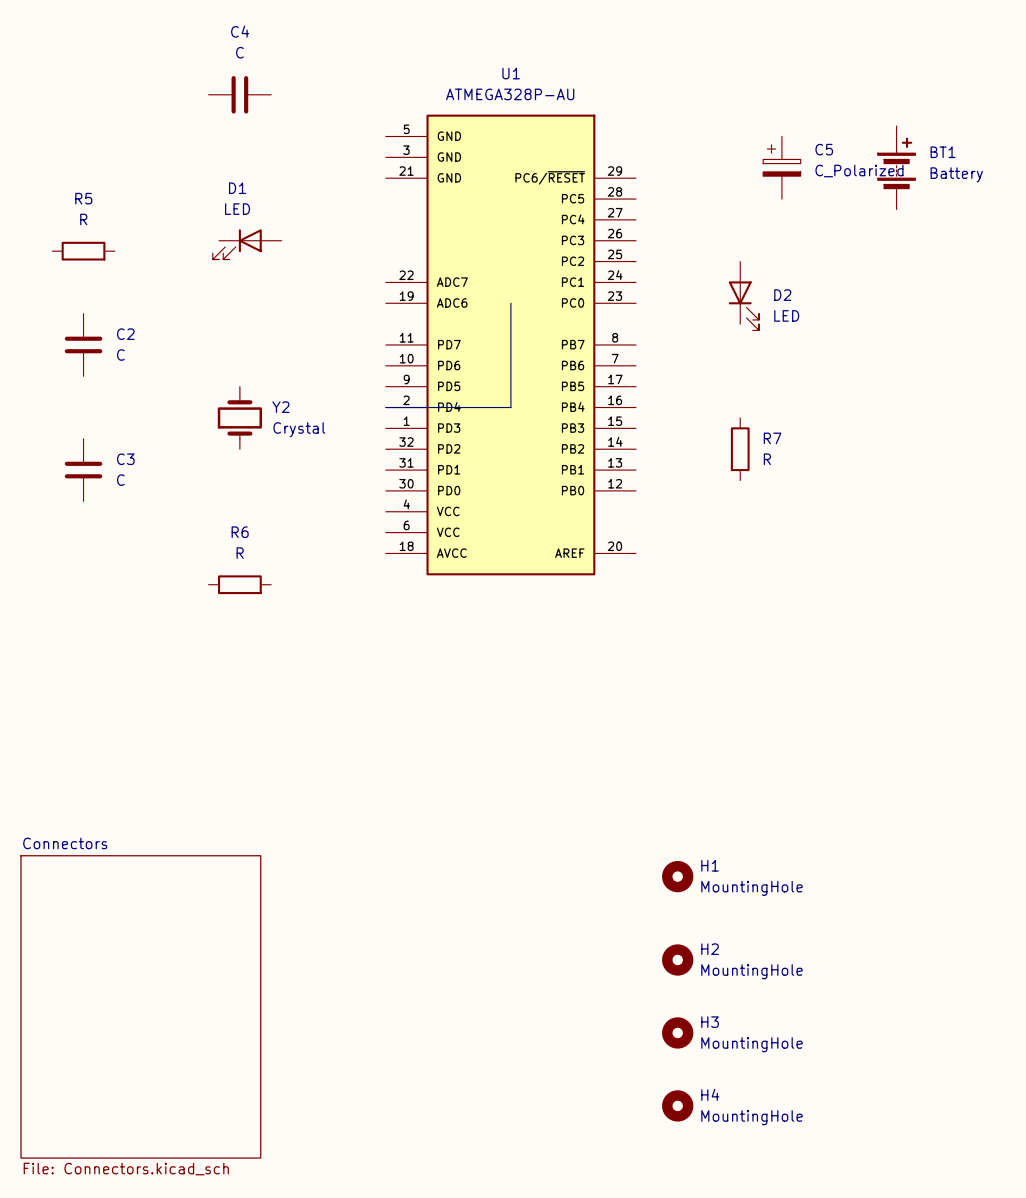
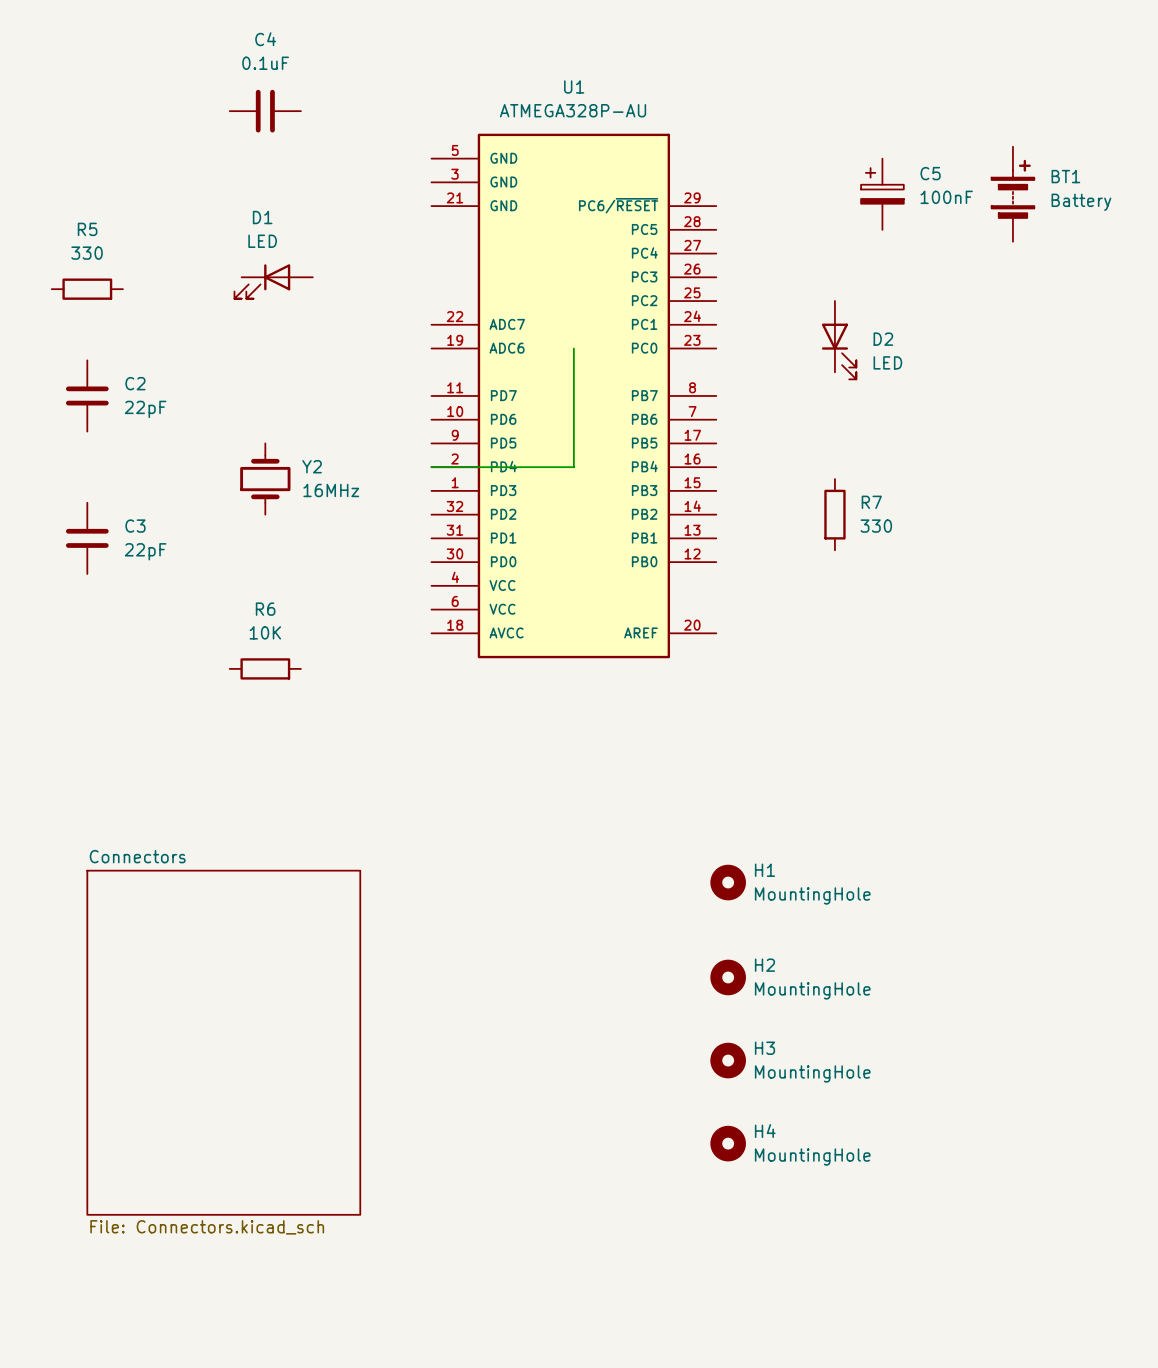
C4 value: C (239, 52) -> 0.1uF (265, 63)
C5 value: C_Polarized (859, 171) -> 100nF (946, 197)
R5 value: R (83, 219) -> 330 (87, 253)
C2 value: C (120, 355) -> 22pF (145, 409)
Y2 value: Crystal (299, 429) -> 16MHz (331, 490)
R7 value: R (767, 459) -> 330 (876, 526)
C3 value: C (120, 480) -> 22pF (145, 551)
R6 value: R (240, 553) -> 10K (265, 632)
H1 position: (677, 876) -> (728, 882)
H2 position: (677, 959) -> (728, 977)
sheet Connectors position: (140, 1006) -> (223, 1042)
H3 position: (677, 1032) -> (728, 1060)
H4 position: (677, 1105) -> (728, 1143)

